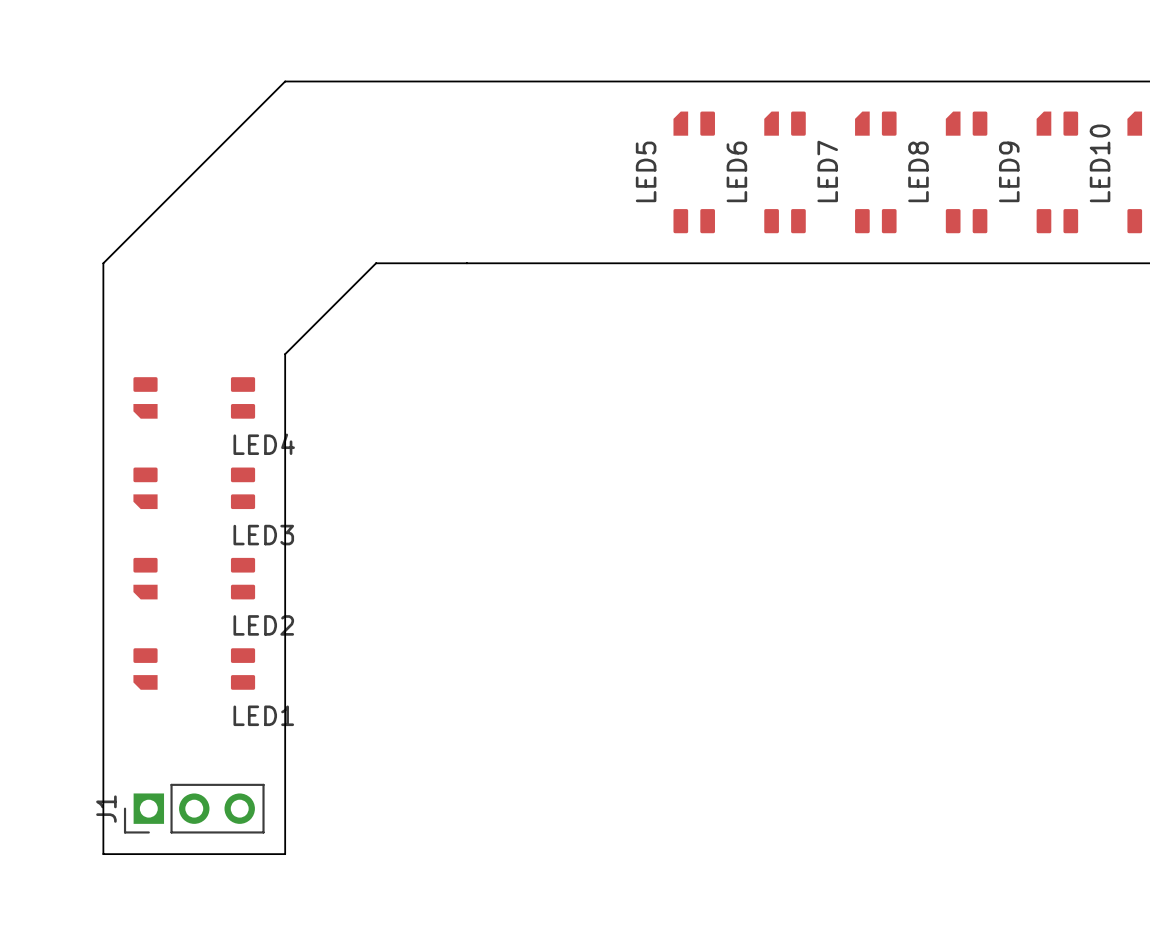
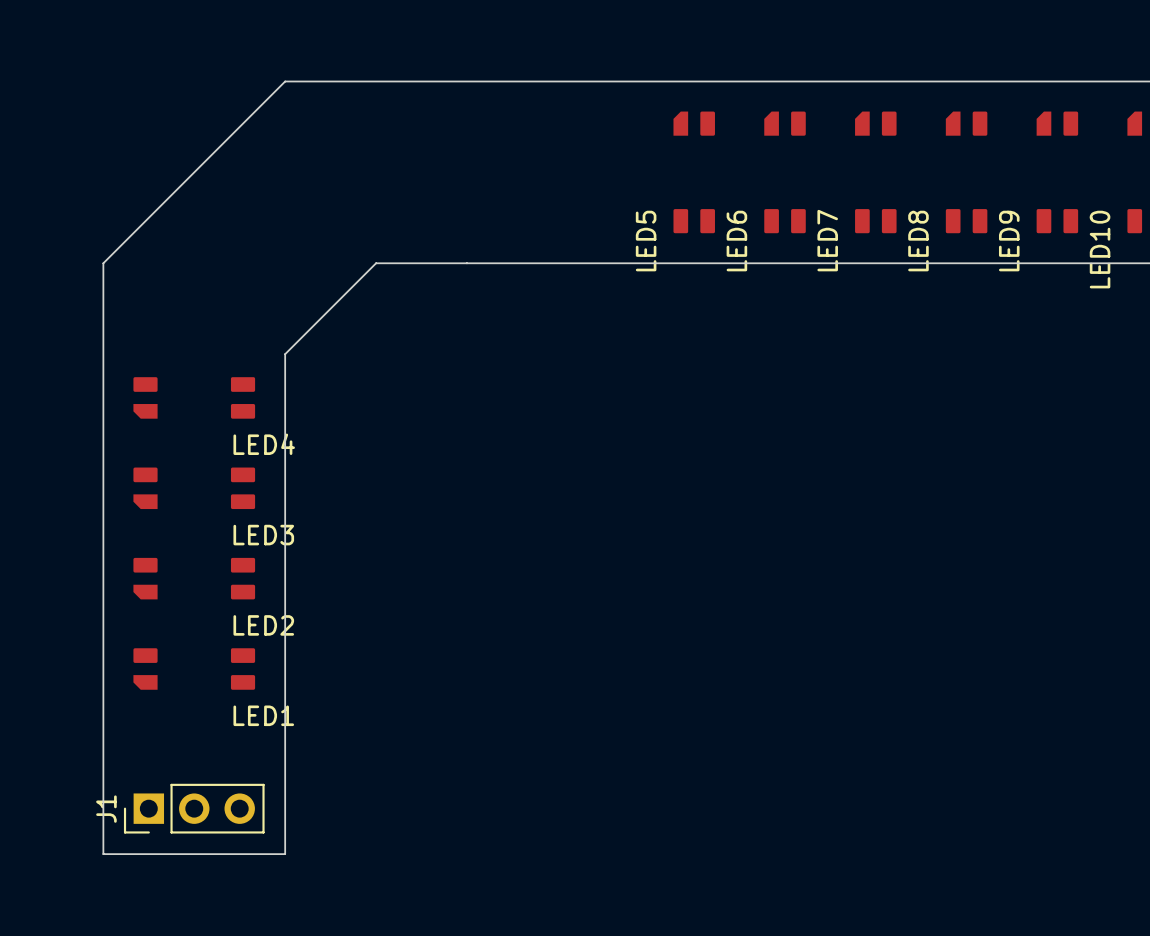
LED10 name position: LED10 (1100, 163) -> LED10 (1100, 249)
LED5 name position: LED5 (646, 171) -> LED5 (646, 241)
LED6 name position: LED6 (736, 171) -> LED6 (736, 241)
LED7 name position: LED7 (827, 171) -> LED7 (827, 240)
LED8 name position: LED8 (918, 171) -> LED8 (918, 241)
LED9 name position: LED9 (1009, 171) -> LED9 (1009, 241)

